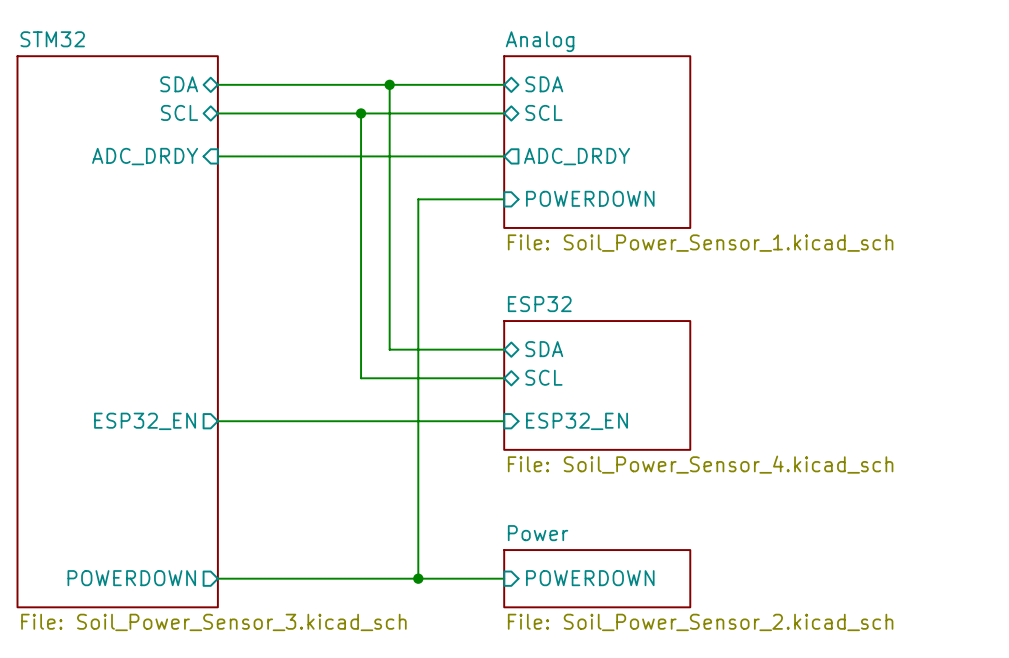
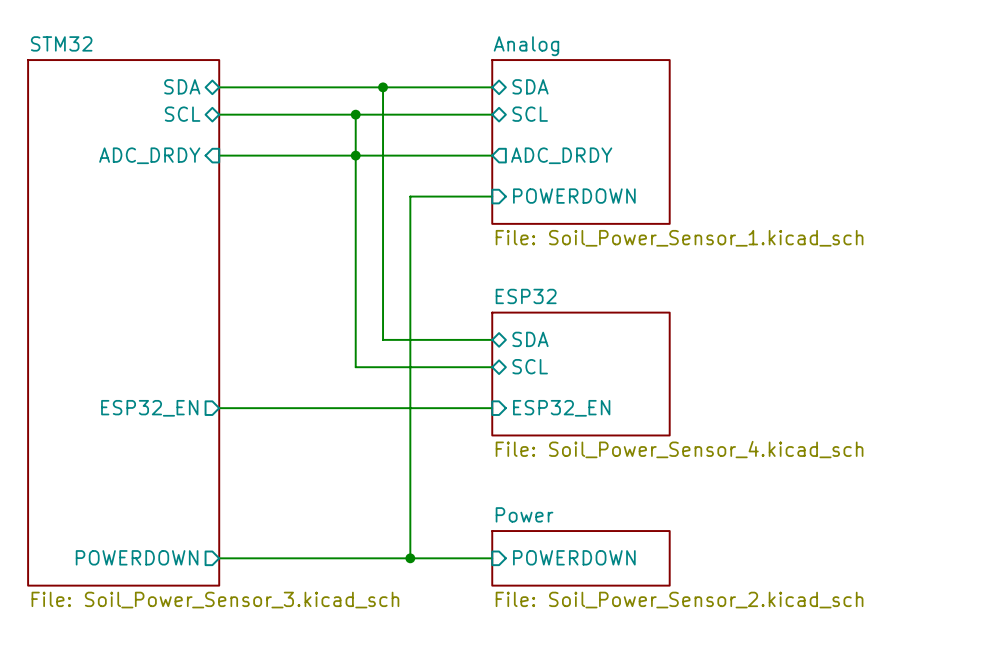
junction: none -> (355, 155)

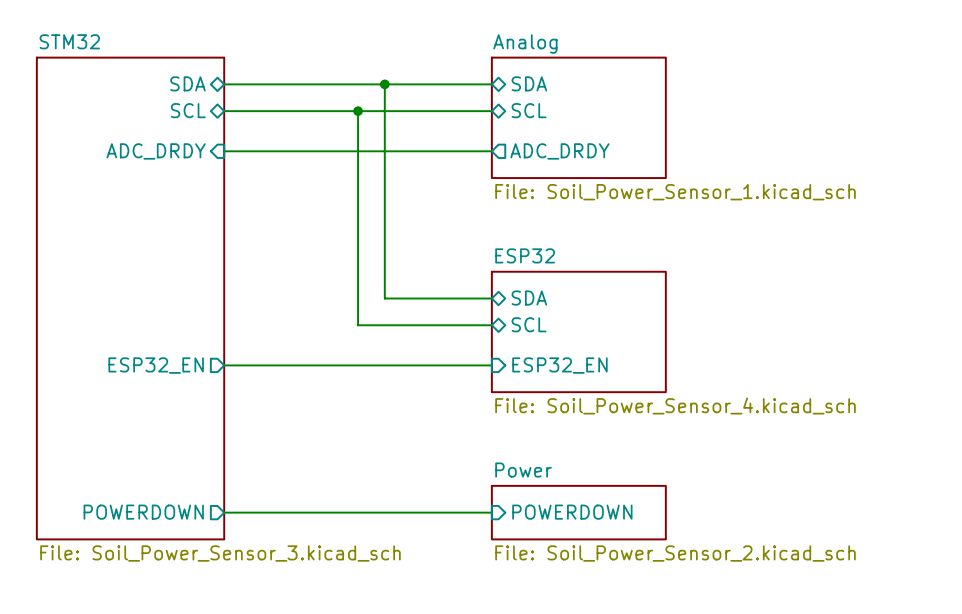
sheet STM32 shape: [28, 60, 220, 586] -> [36, 57, 225, 540]
sheet Analog: none -> File: Soil_Power_Sensor_1.kicad_sch (578, 117)
sheet Analog: File: Soil_Power_Sensor_1.kicad_sch (580, 141) -> none
junction: (355, 155) -> none
wire: (492, 196) (410, 196) (410, 558) -> none
sheet pin: POWERDOWN (574, 196) -> none
wire: (383, 305) (383, 339) (492, 339) -> (384, 298) (491, 298)
wire: (355, 333) (355, 367) (492, 367) -> (358, 325) (491, 325)
sheet pin position: SDA (530, 339) -> SDA (529, 298)
sheet pin position: SCL (530, 366) -> SCL (529, 324)
sheet ESP32 position: (580, 374) -> (578, 331)
sheet pin position: ESP32_EN (149, 408) -> ESP32_EN (156, 365)
wire: (219, 408) (492, 408) -> (224, 365) (491, 365)
sheet pin position: ESP32_EN (561, 408) -> ESP32_EN (559, 365)
sheet pin position: POWERDOWN (137, 557) -> POWERDOWN (143, 512)
sheet pin position: POWERDOWN (574, 557) -> POWERDOWN (572, 512)
wire: (219, 558) (492, 558) -> (224, 512) (491, 512)
junction: (410, 558) -> none
sheet Power position: (580, 558) -> (578, 512)

